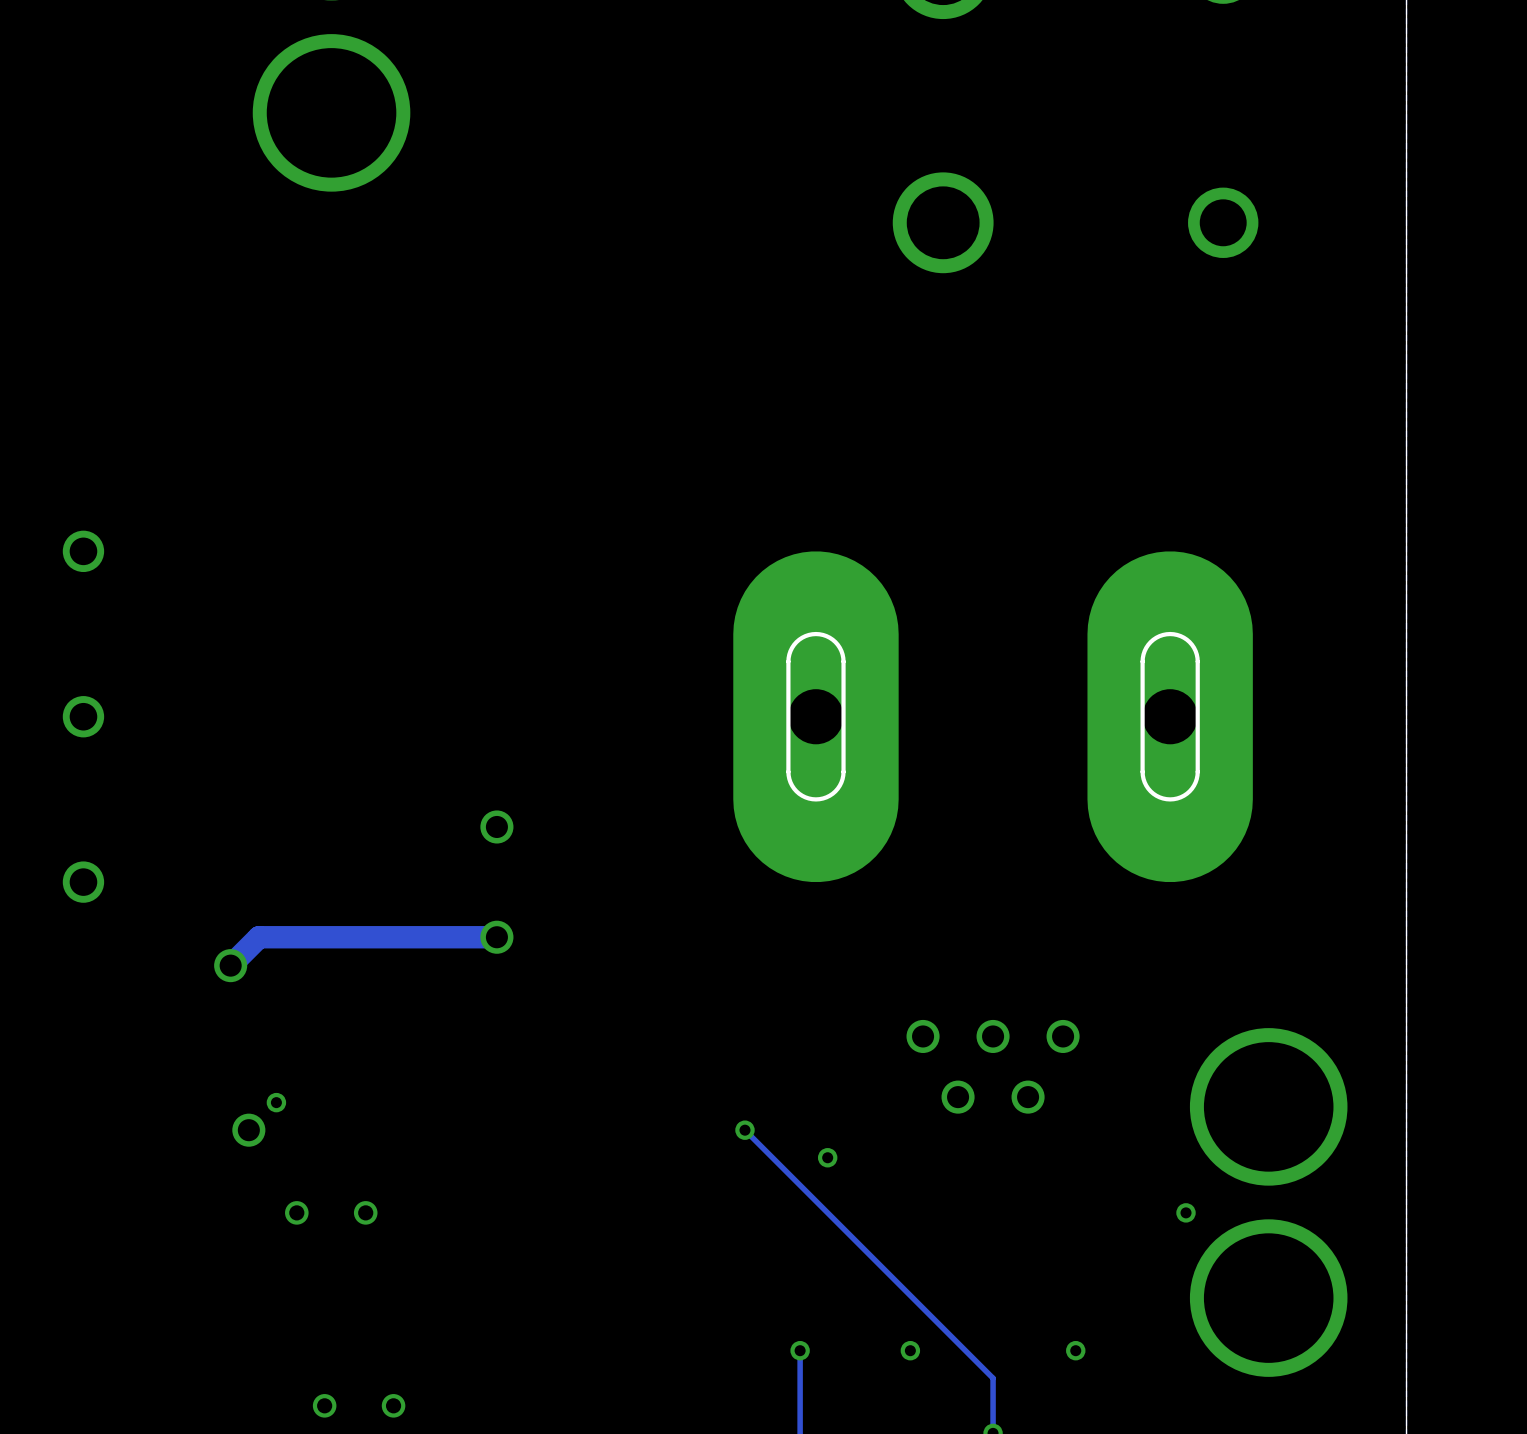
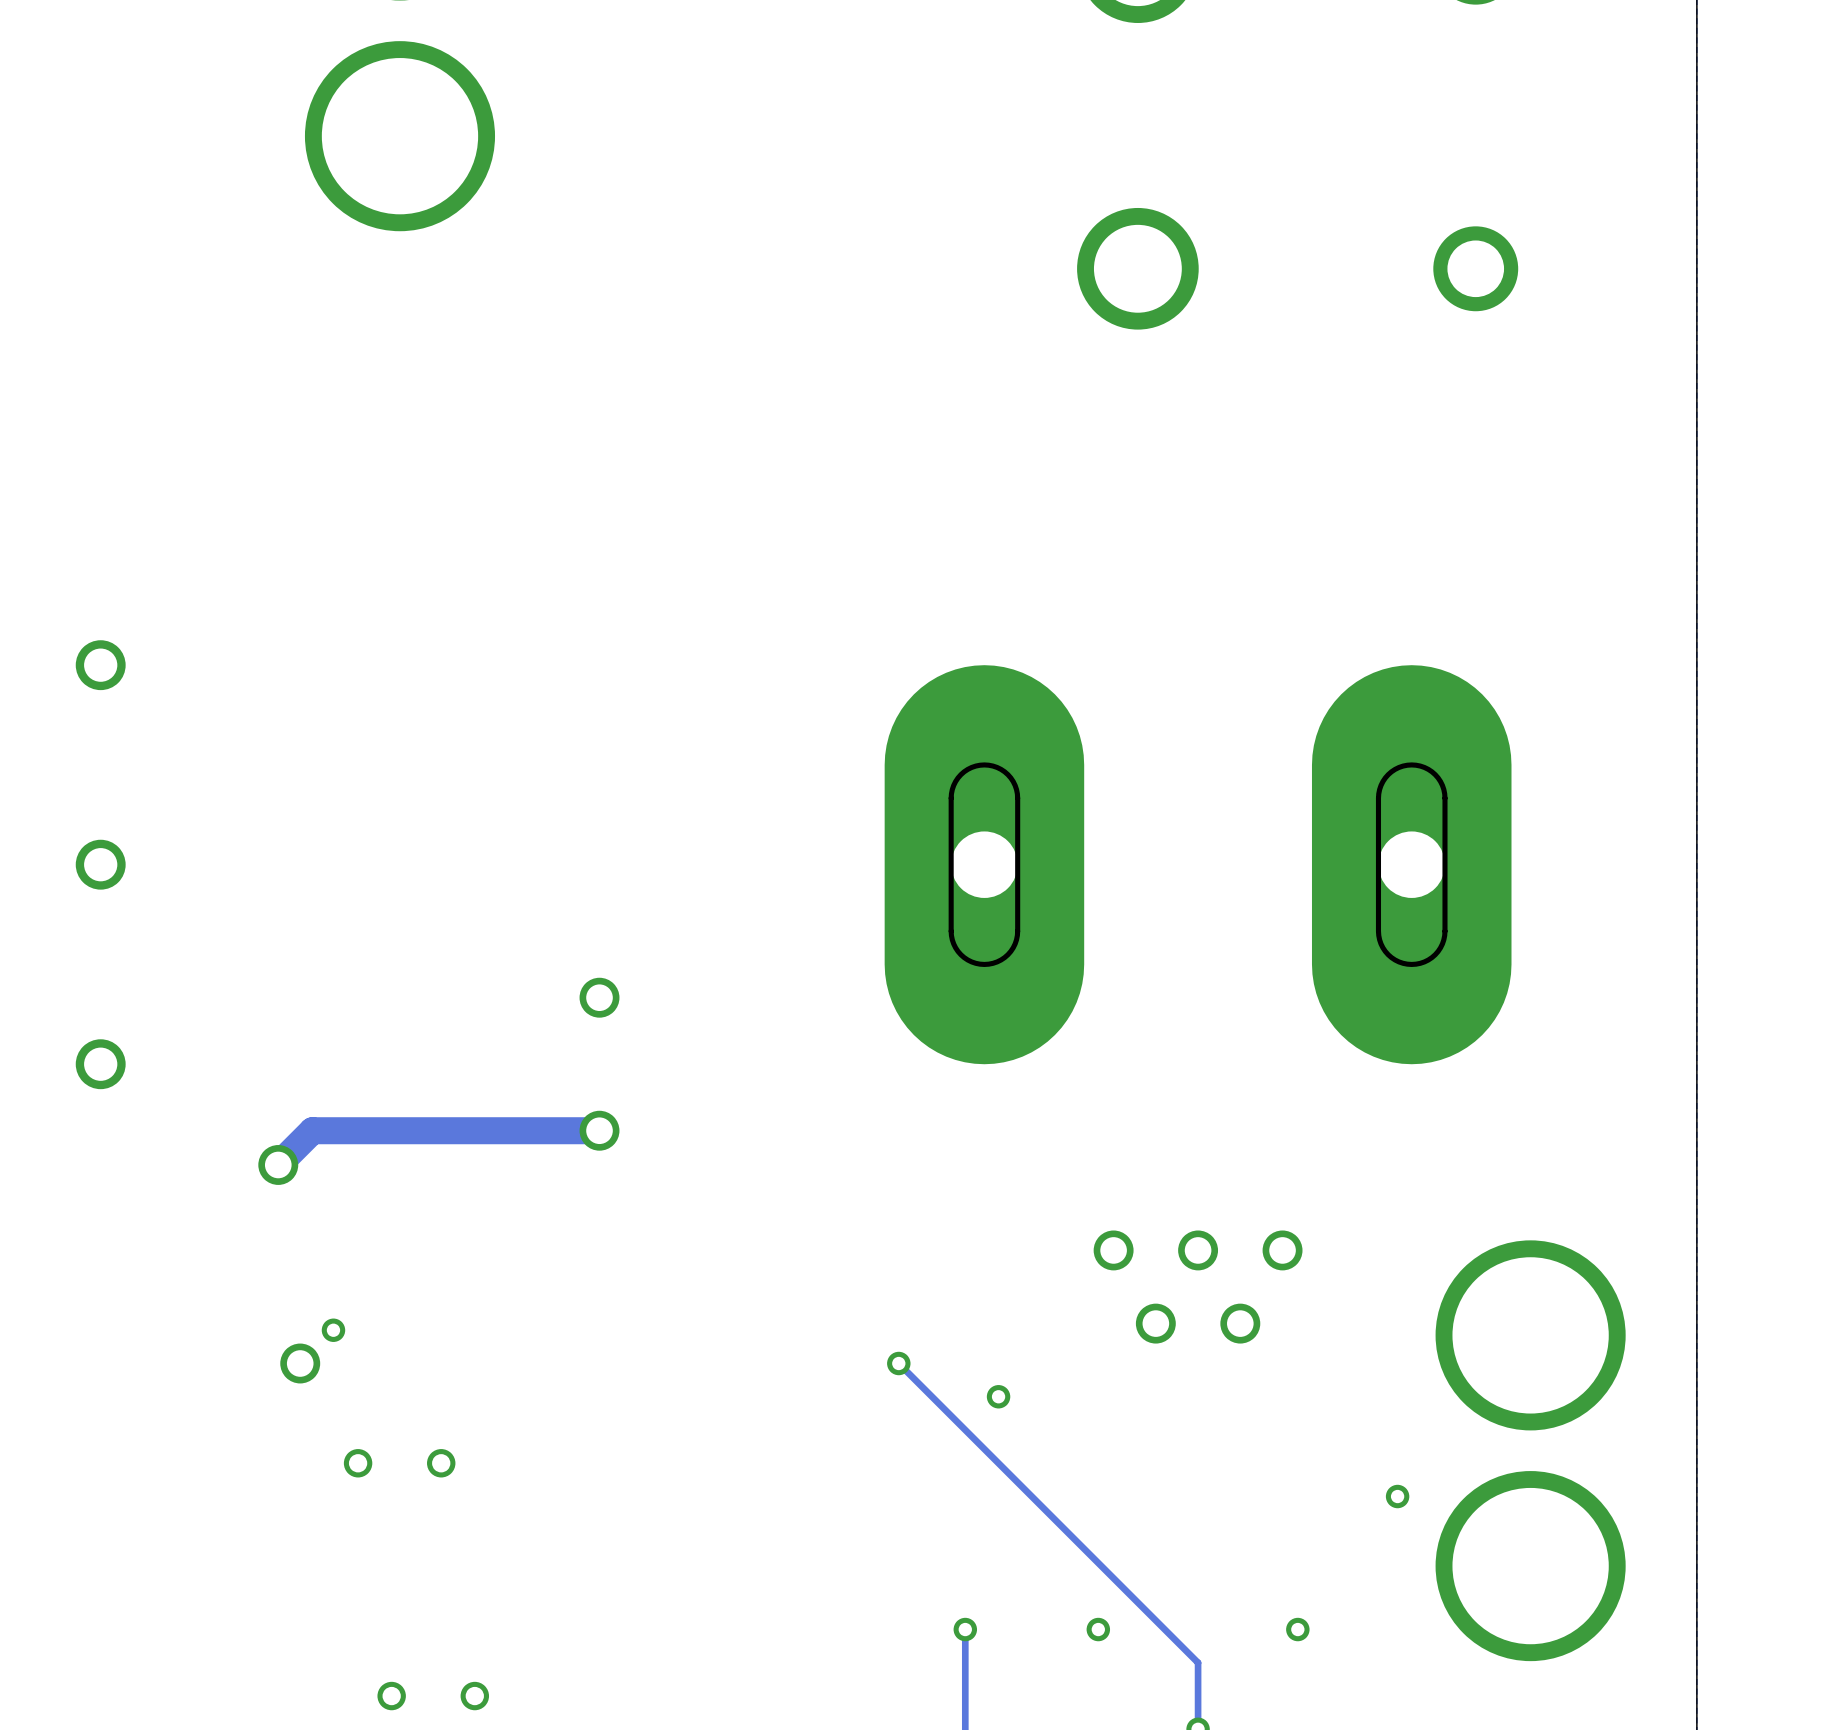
via position: (1186, 1212) -> (1397, 1496)

